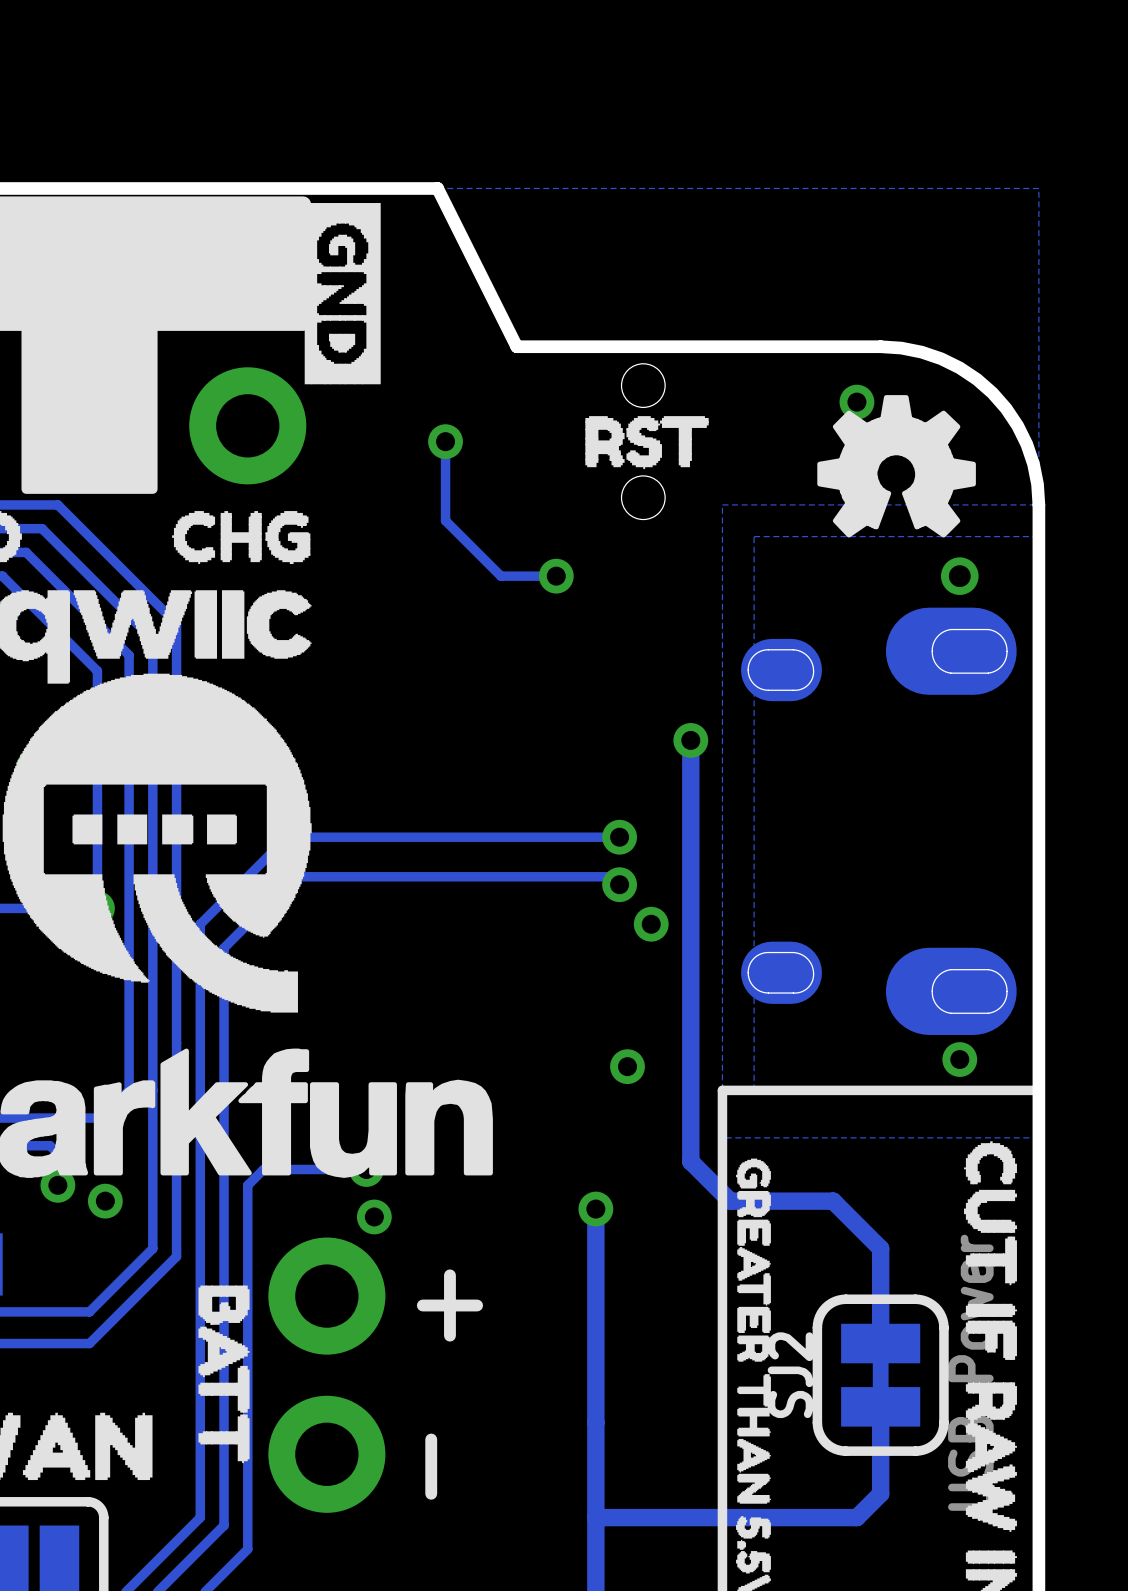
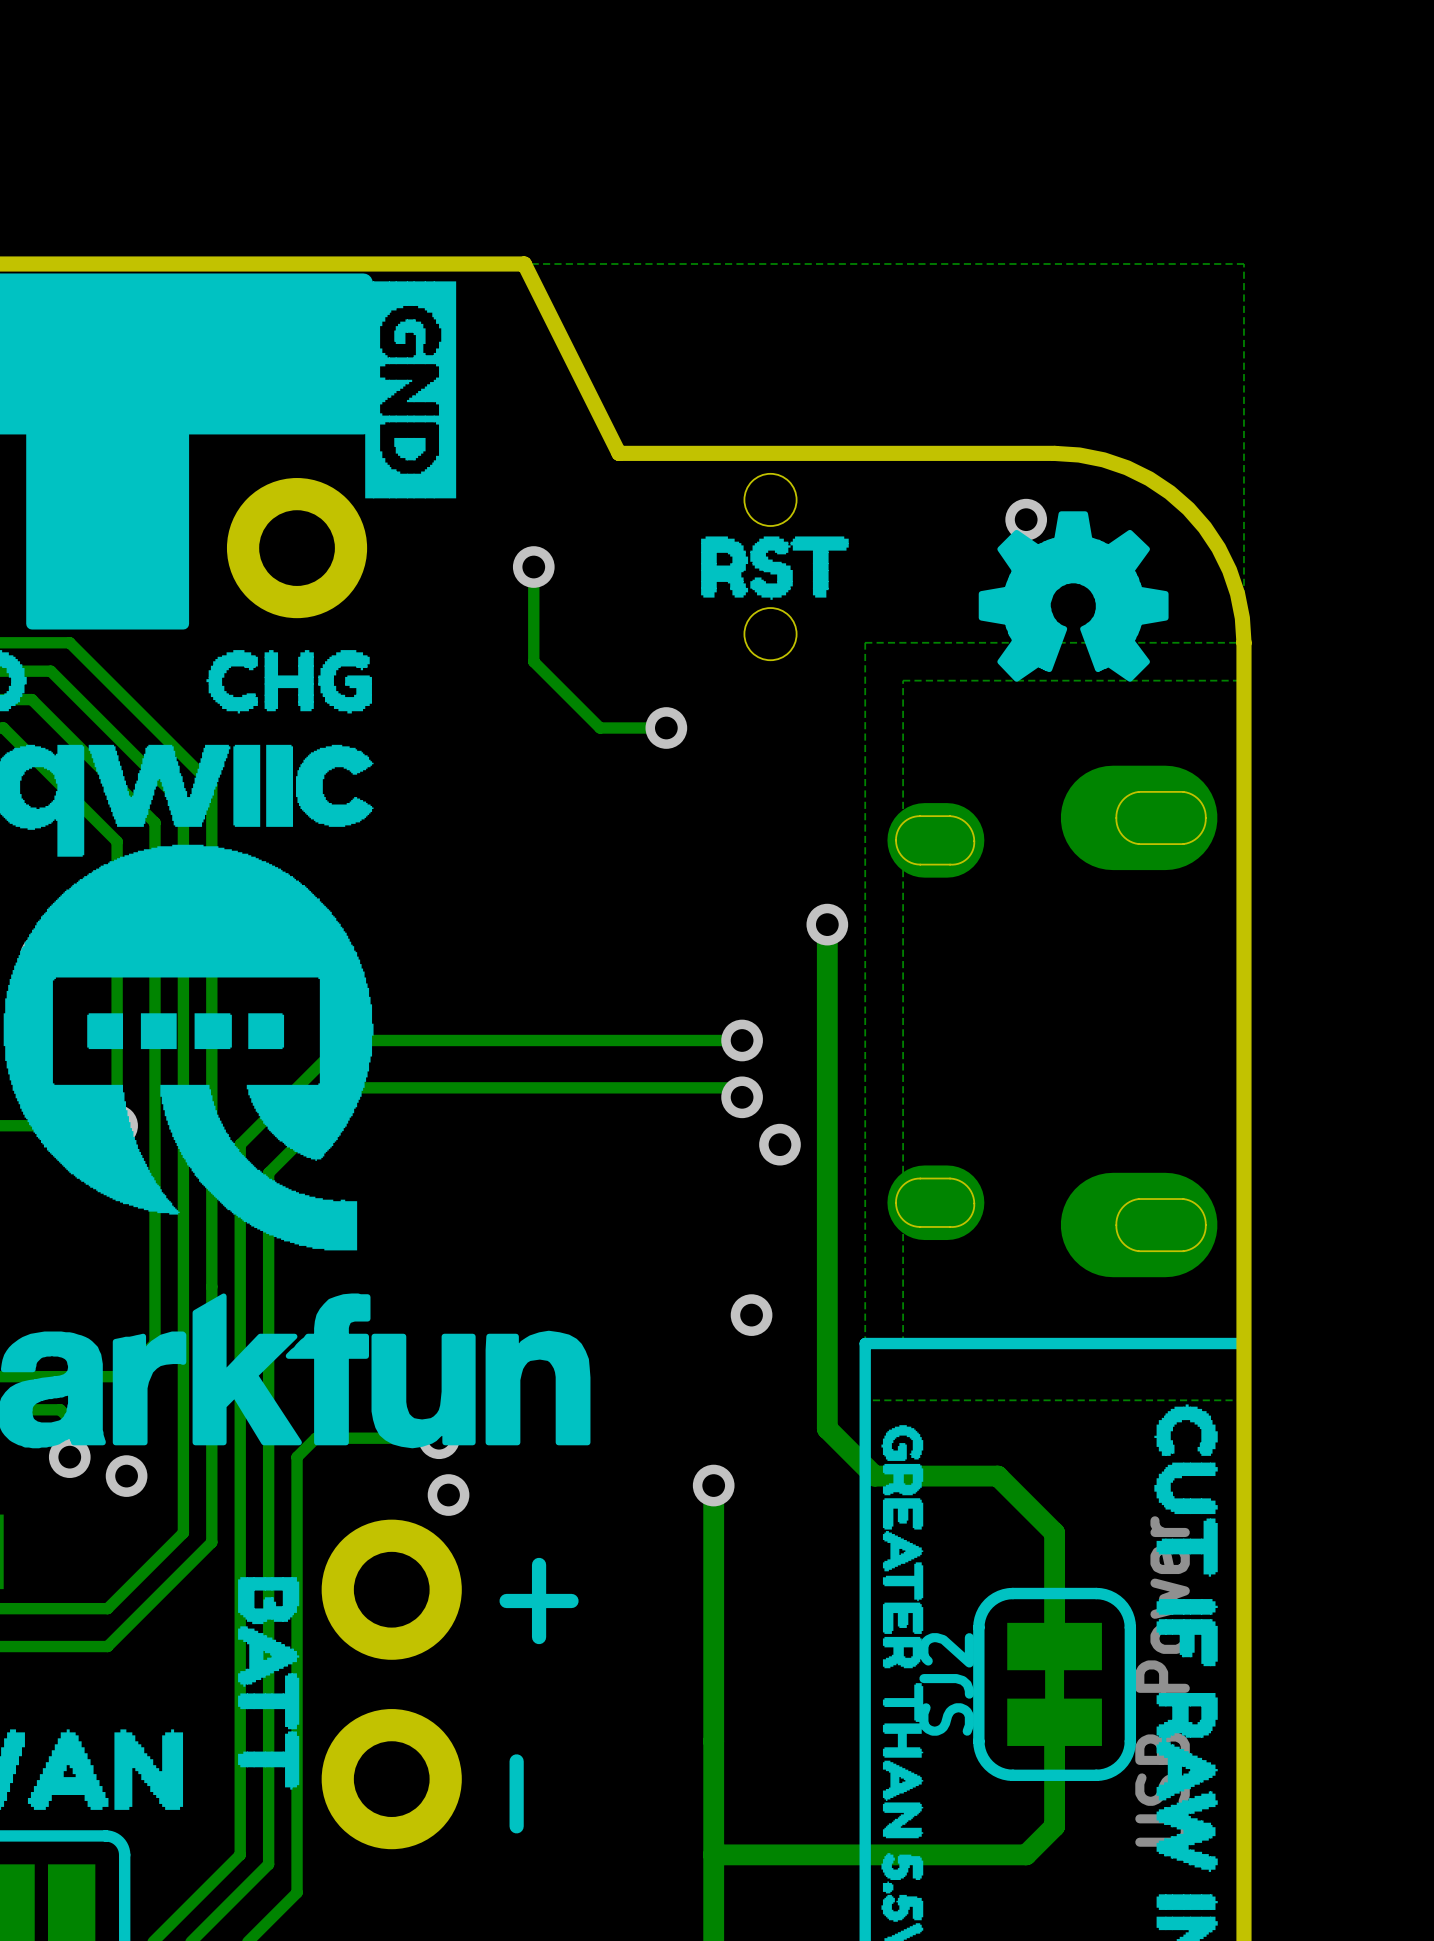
via: (959, 576) -> none
via: (959, 1059) -> none

